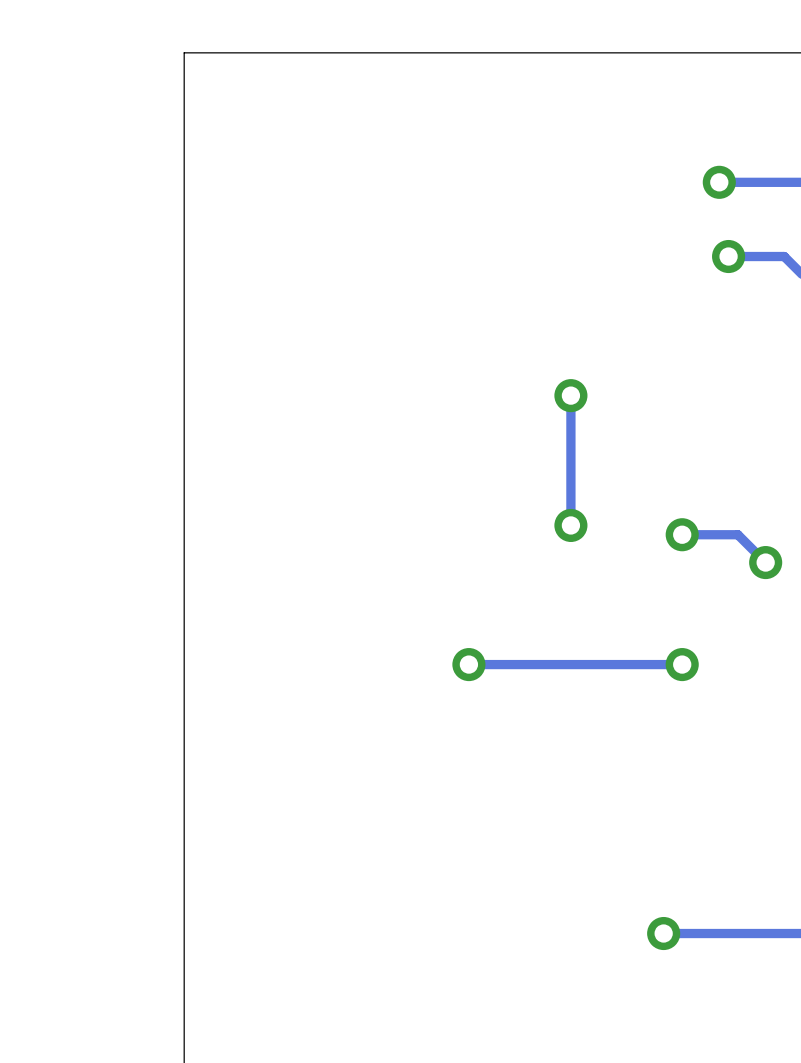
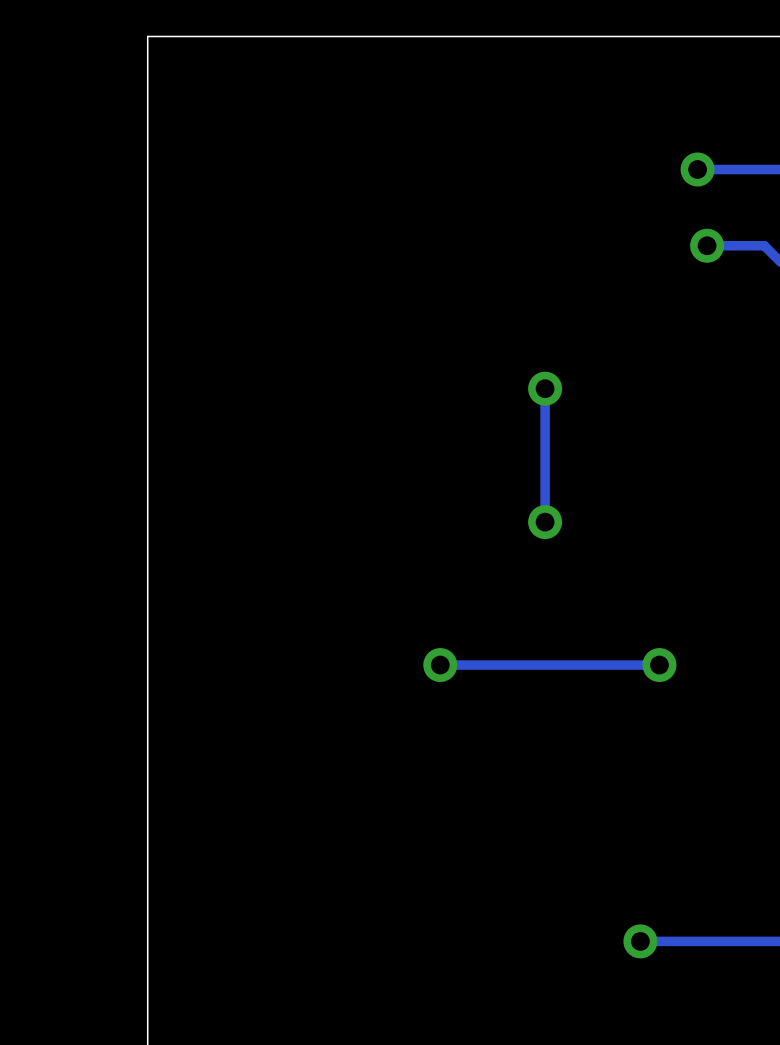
track: (682, 534) (737, 534) (765, 562) -> none
via: (682, 534) -> none
via: (765, 562) -> none

